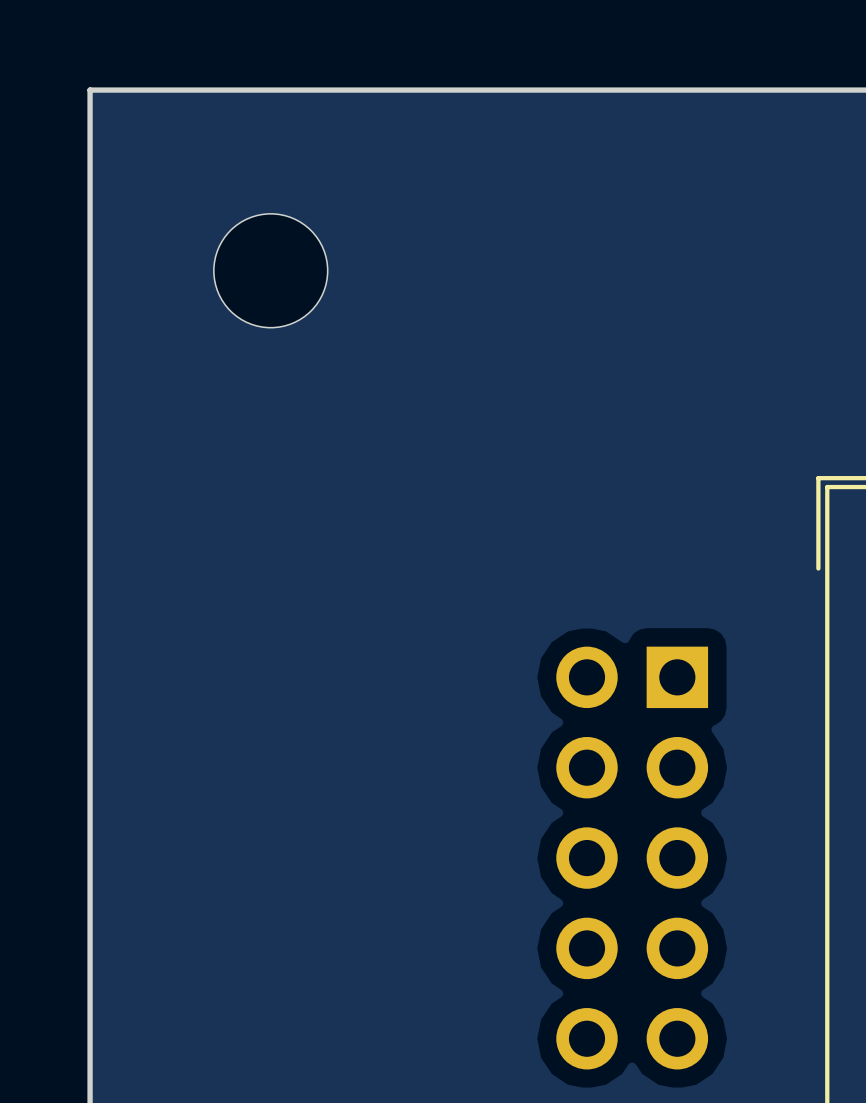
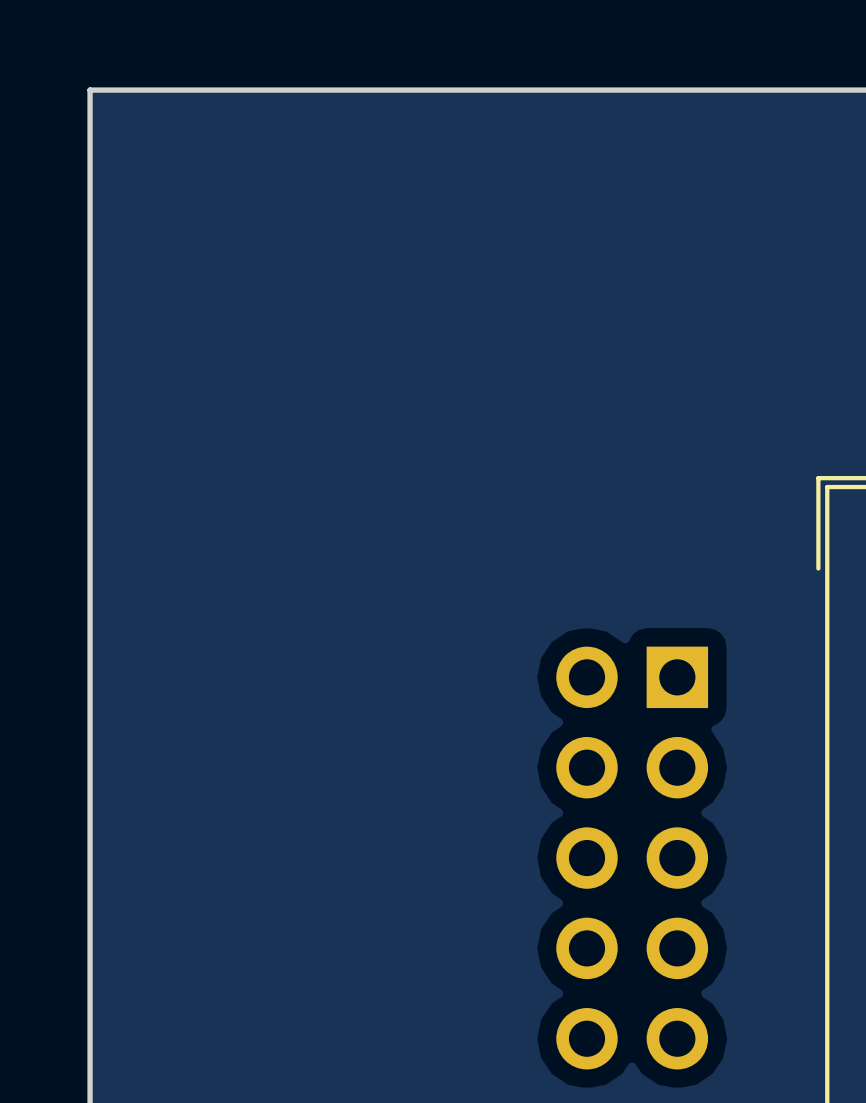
part: (270, 270) -> none

